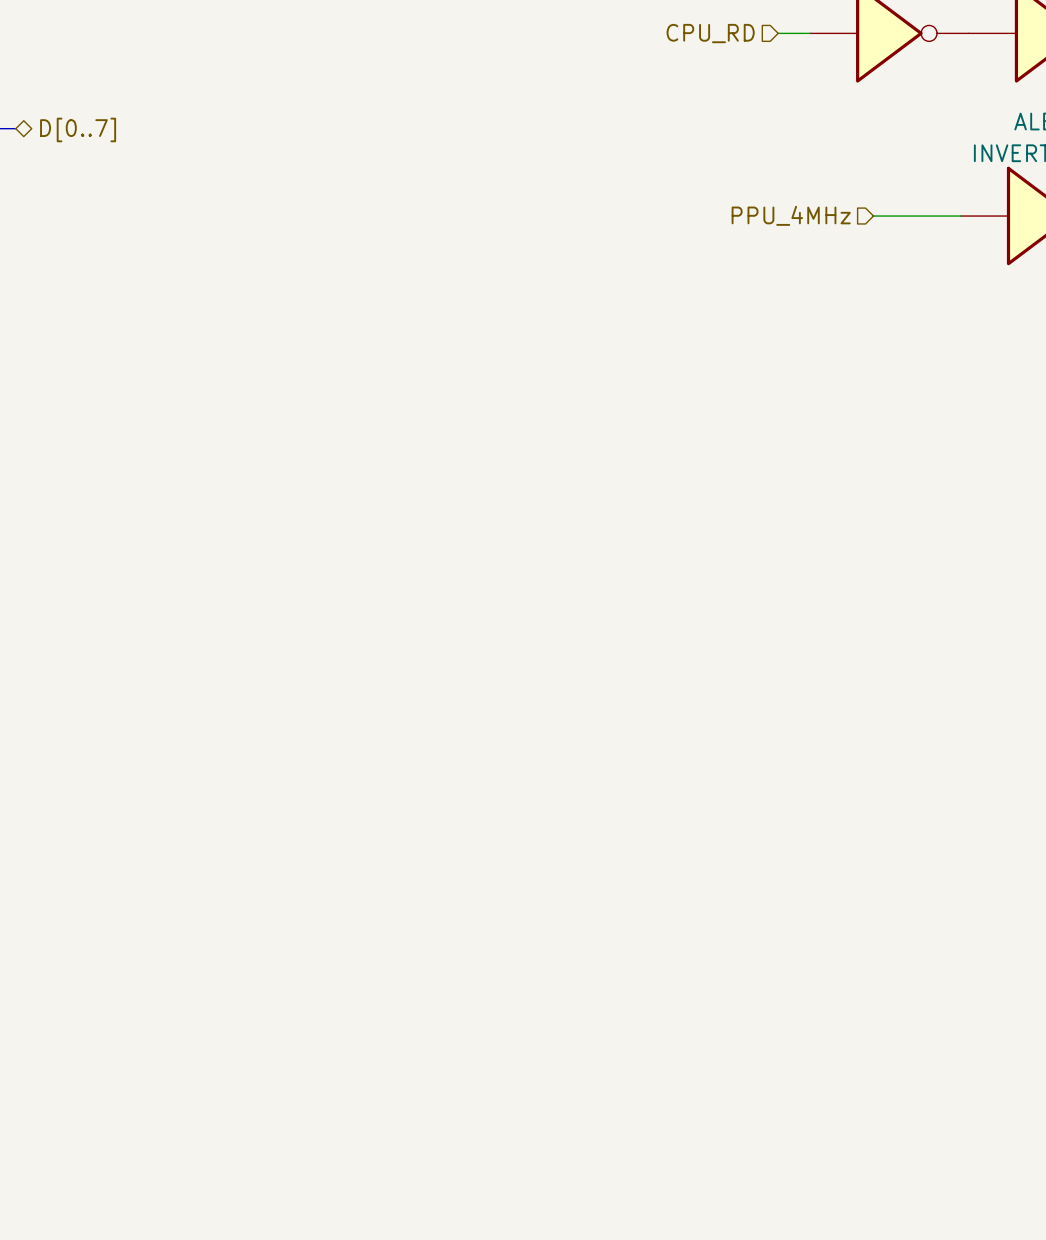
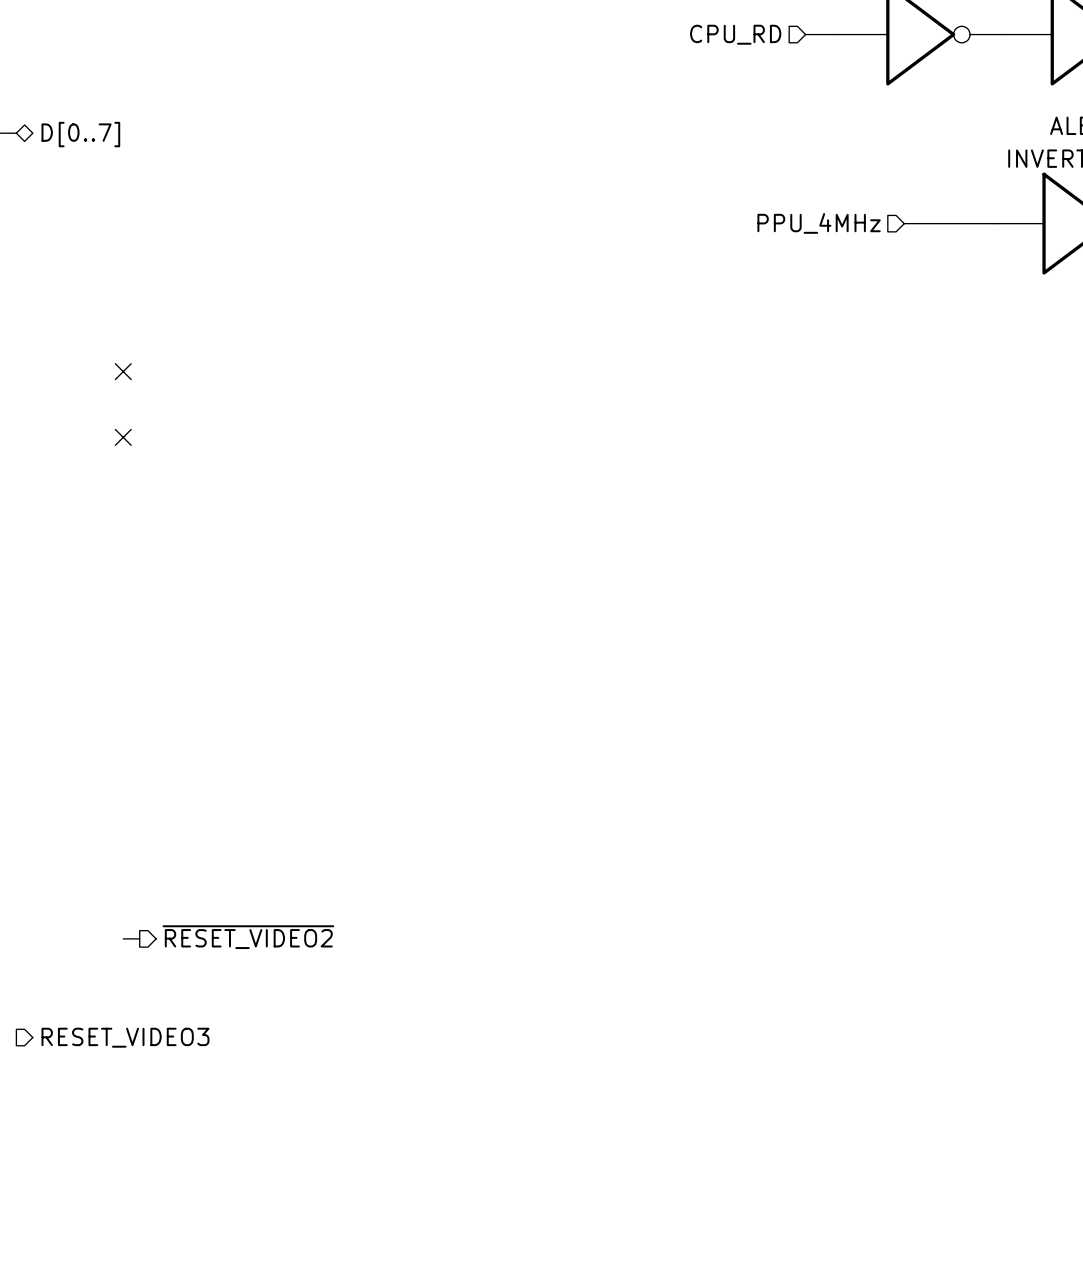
no-connect mark: none -> (123, 371)
no-connect mark: none -> (123, 437)
hierarchical label: none -> ~{RESET_VIDEO2} (248, 937)
wire: none -> (123, 938) (139, 938)
hierarchical label: none -> RESET_VIDEO3 (125, 1037)

